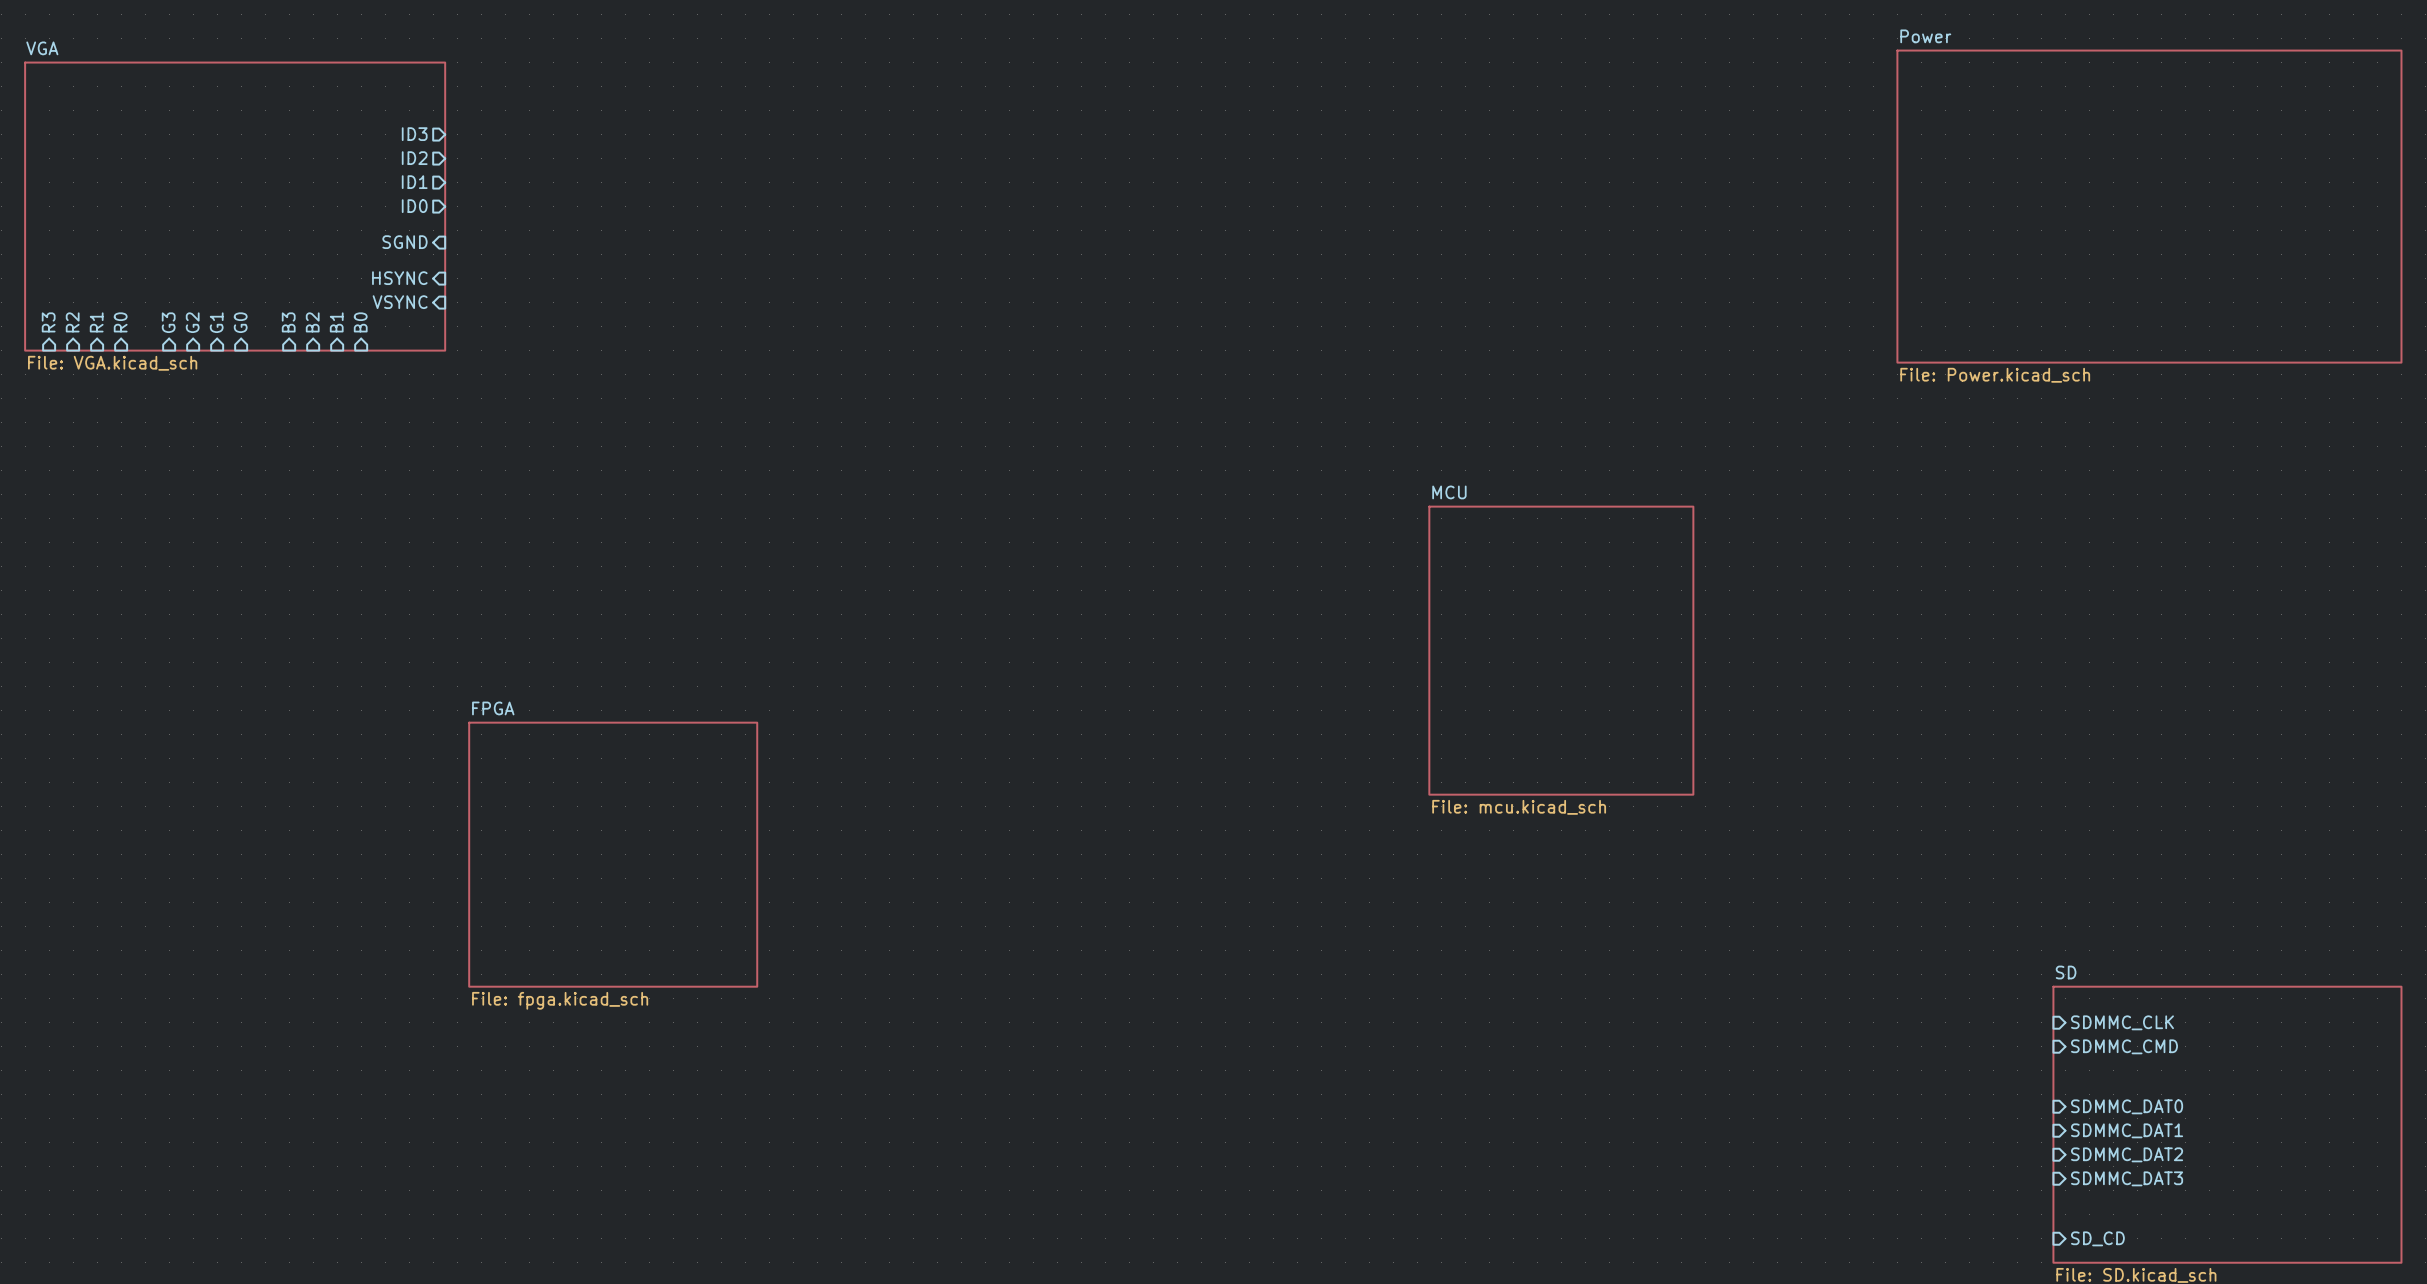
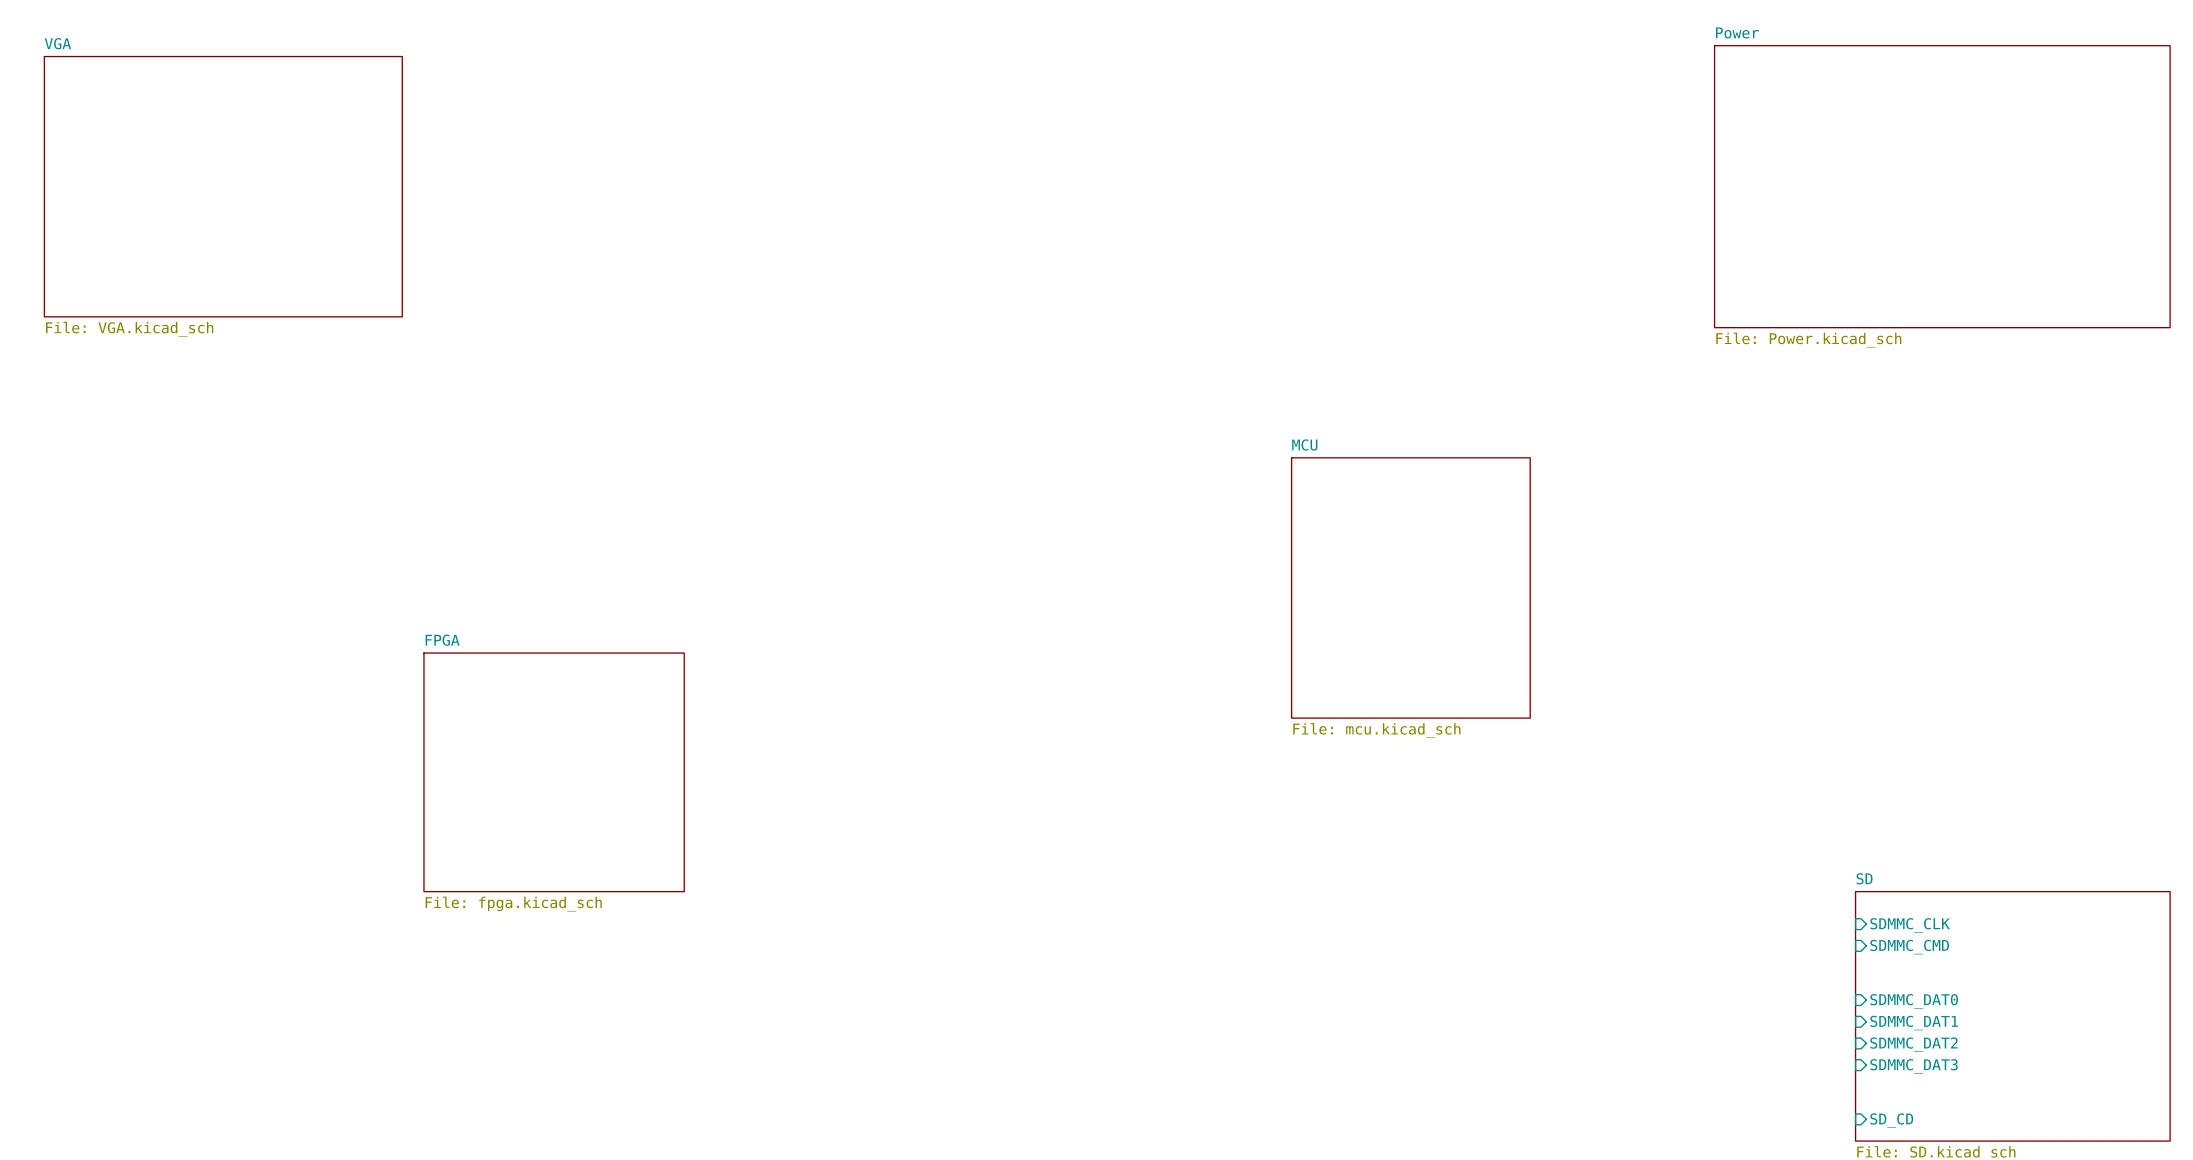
sheet pin: ID3 (414, 134) -> none
sheet pin: ID2 (414, 158) -> none
sheet pin: ID1 (414, 182) -> none
sheet VGA: File: VGA.kicad_sch (235, 206) -> none
sheet VGA: none -> File: VGA.kicad_sch (223, 186)
sheet pin: ID0 (414, 206) -> none
sheet pin: SGND (404, 242) -> none
sheet pin: HSYNC (399, 278) -> none
sheet pin: VSYNC (400, 302) -> none
sheet pin: R3 (48, 322) -> none
sheet pin: R2 (72, 322) -> none
sheet pin: R1 (96, 322) -> none
sheet pin: R0 (120, 322) -> none
sheet pin: G3 (168, 322) -> none
sheet pin: G2 (192, 322) -> none
sheet pin: G1 (216, 322) -> none
sheet pin: G0 (240, 322) -> none
sheet pin: B3 (288, 322) -> none
sheet pin: B2 (312, 322) -> none
sheet pin: B1 (336, 322) -> none
sheet pin: B0 (360, 322) -> none

